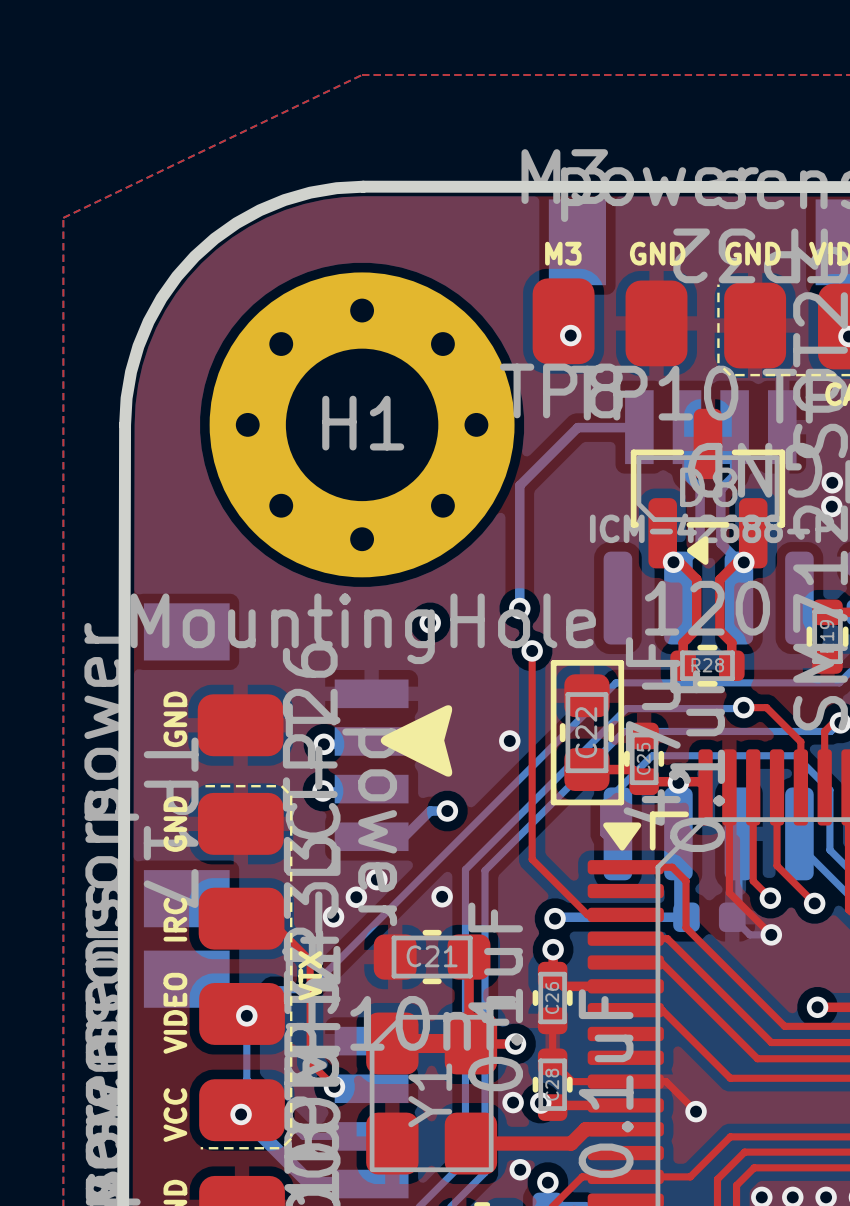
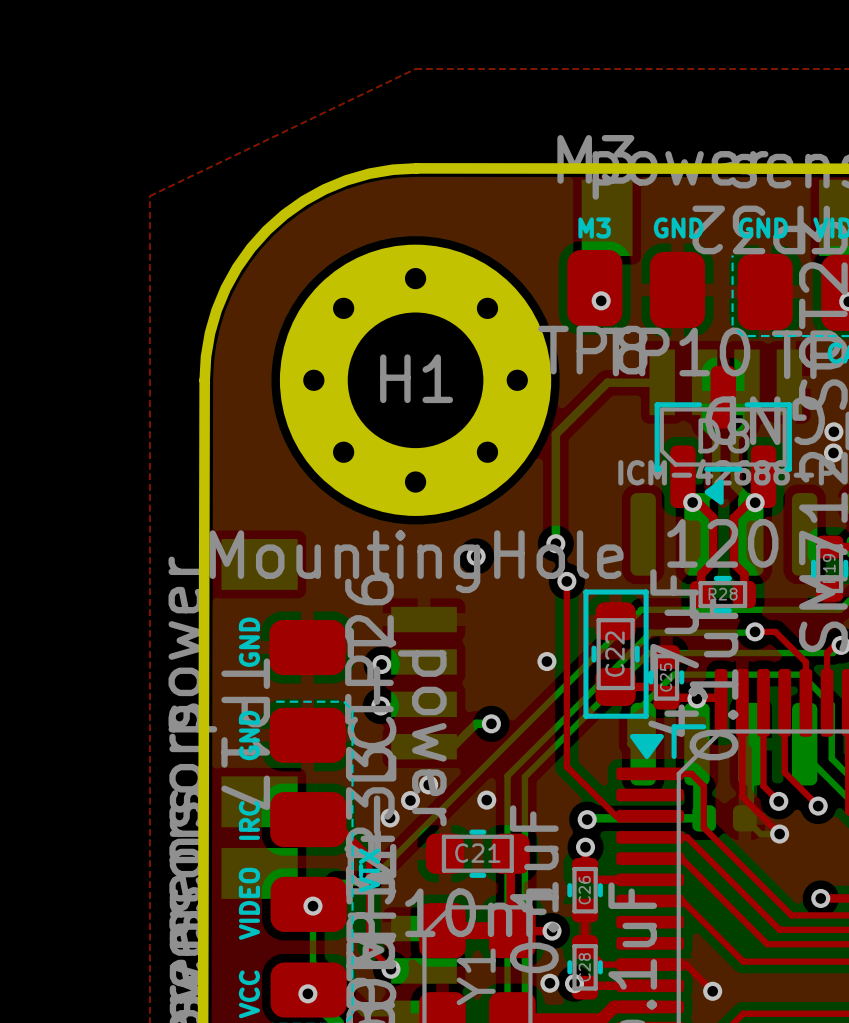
drawing: [380, 705, 453, 777] -> none

